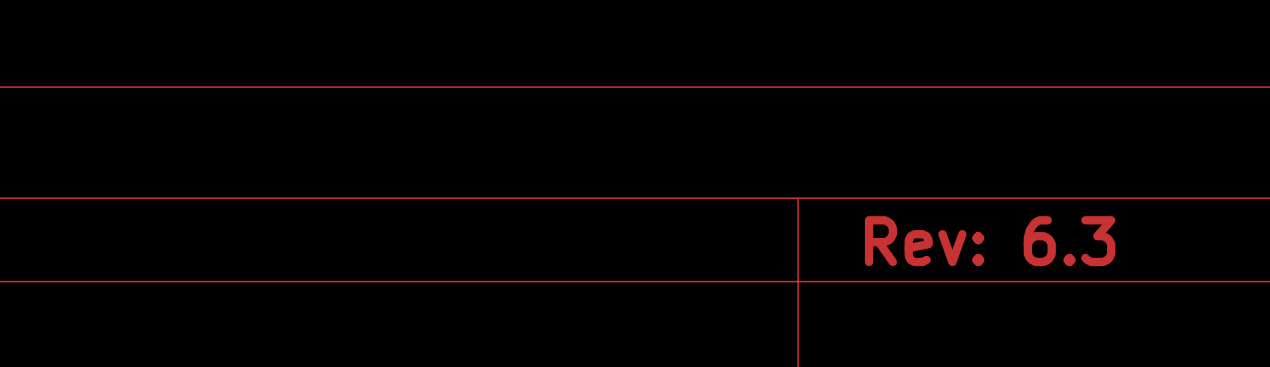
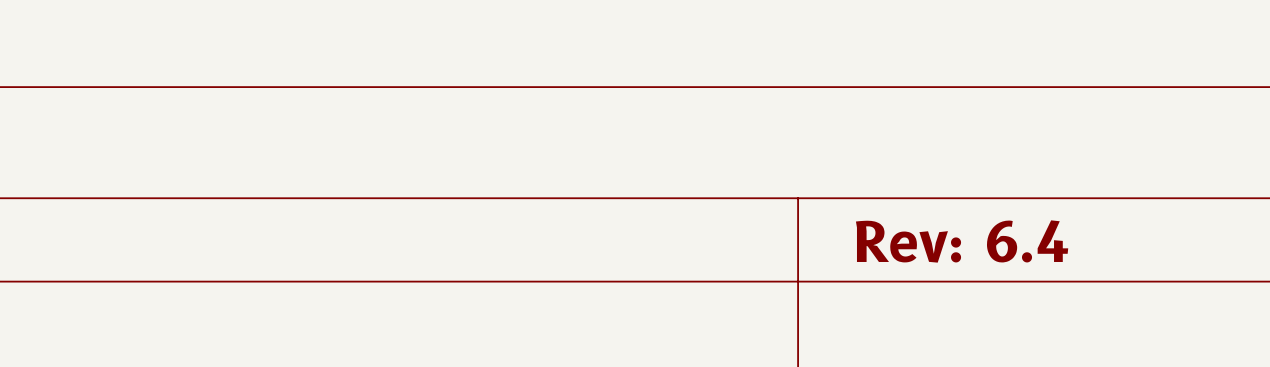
title block: Rev: 6.3 (990, 241) -> Rev: 6.4 (962, 241)

